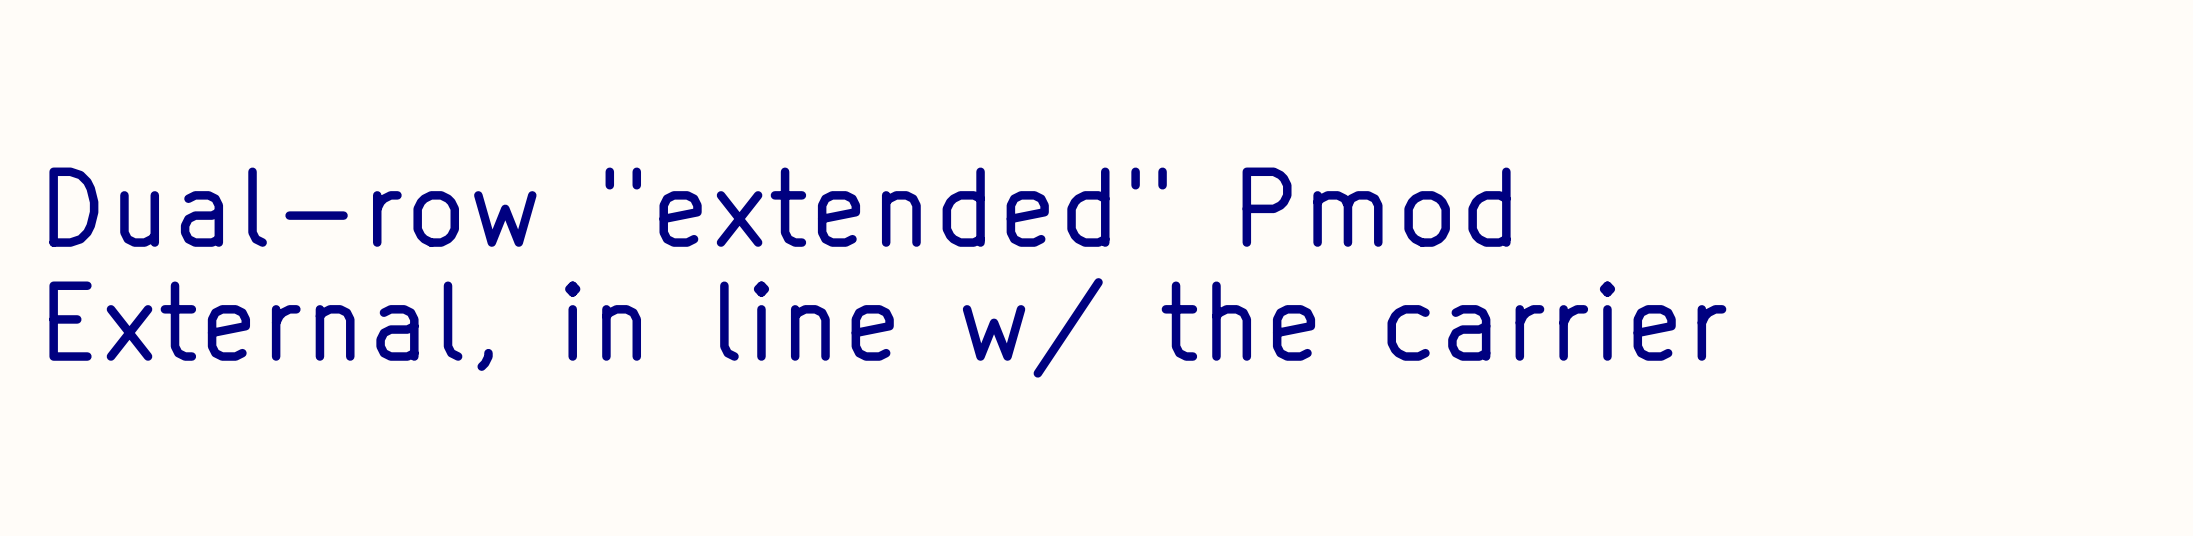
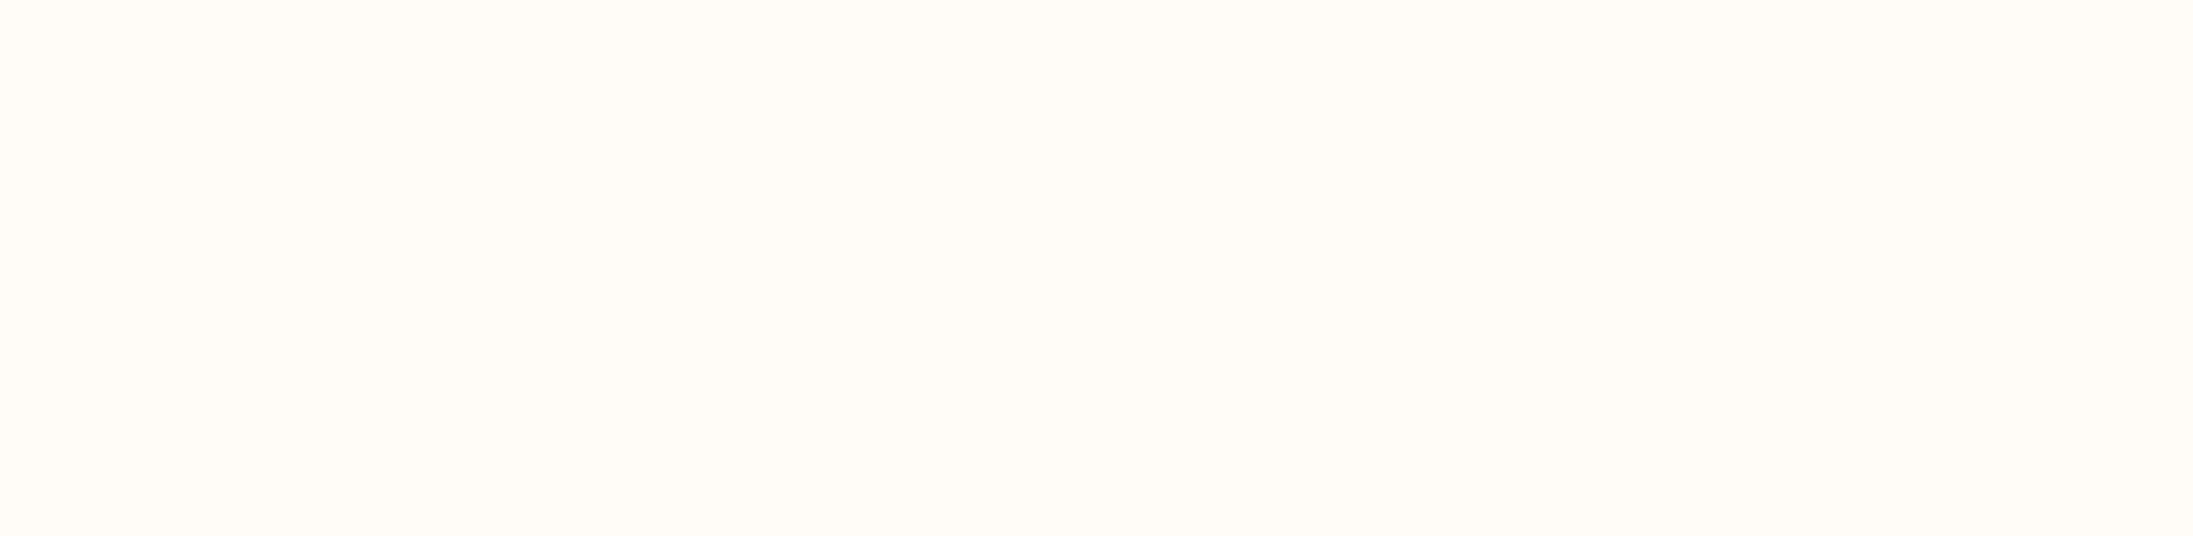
text: Dual-row "extended" Pmod (780, 207) -> none
text: External, in line w/ the carrier (887, 327) -> none

